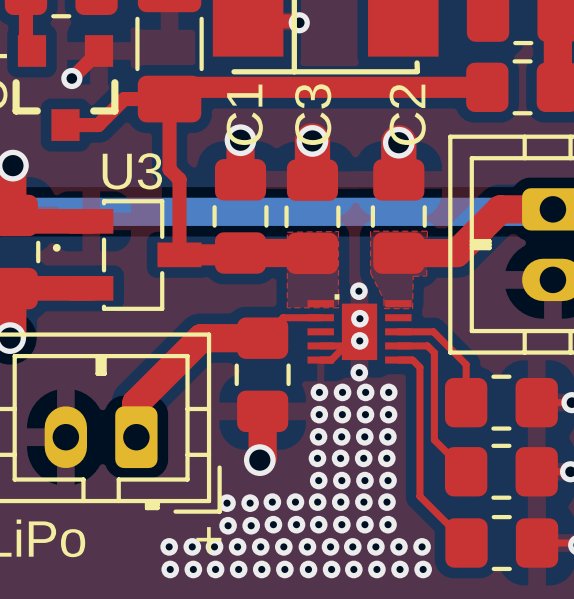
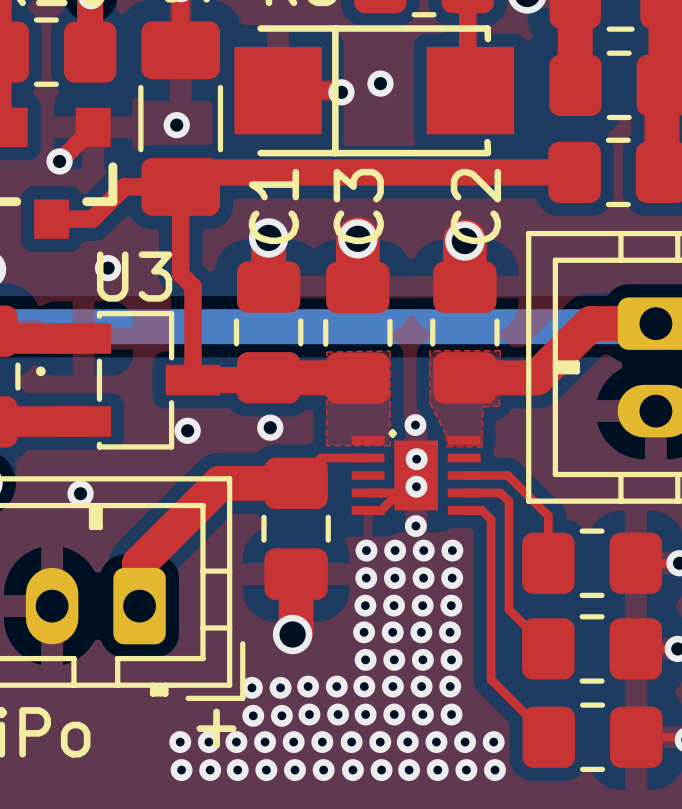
via: none -> (380, 83)
via: none -> (176, 125)
via: none -> (108, 268)
via: none -> (270, 427)
via: none -> (187, 430)
via: none -> (80, 493)

